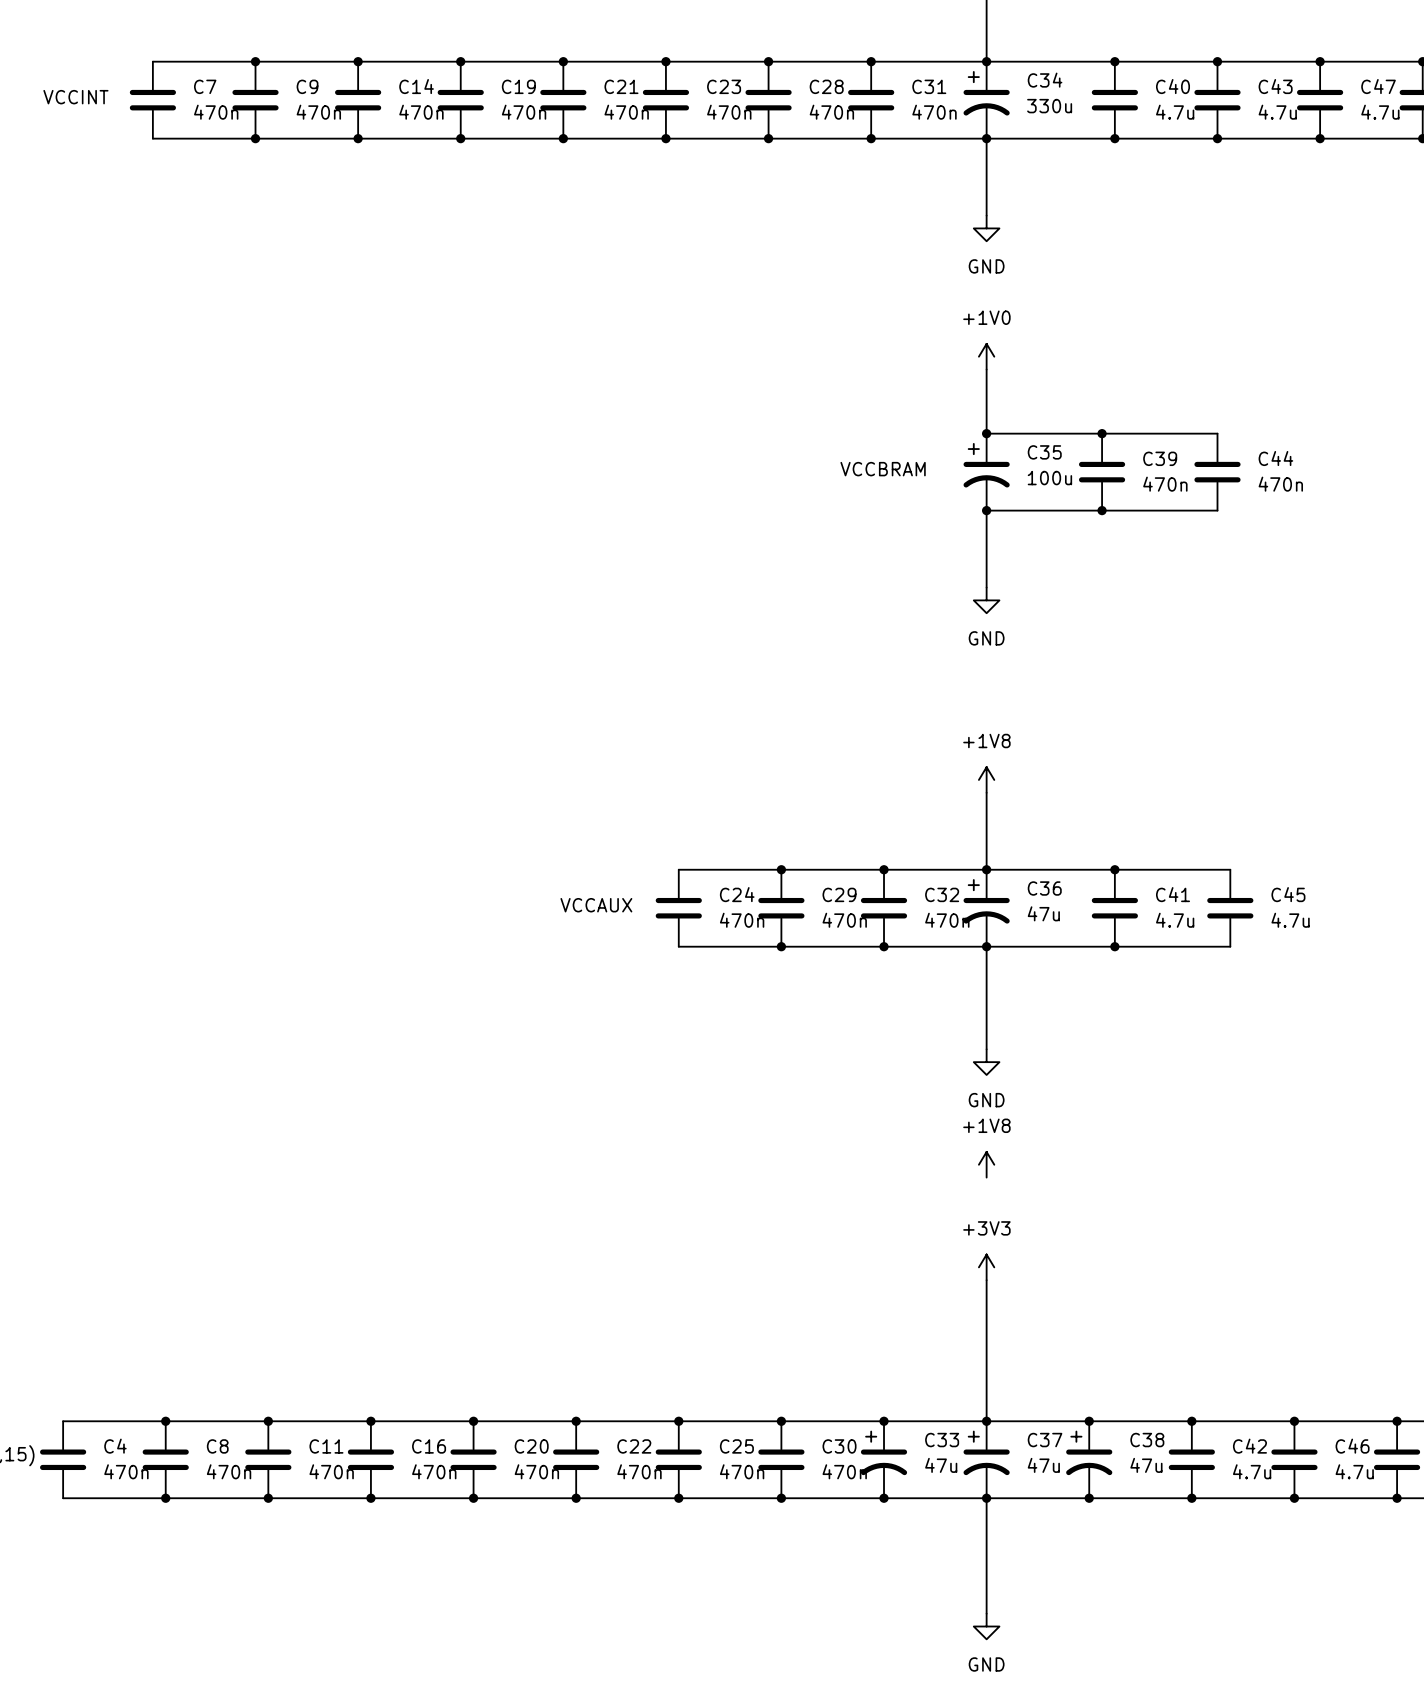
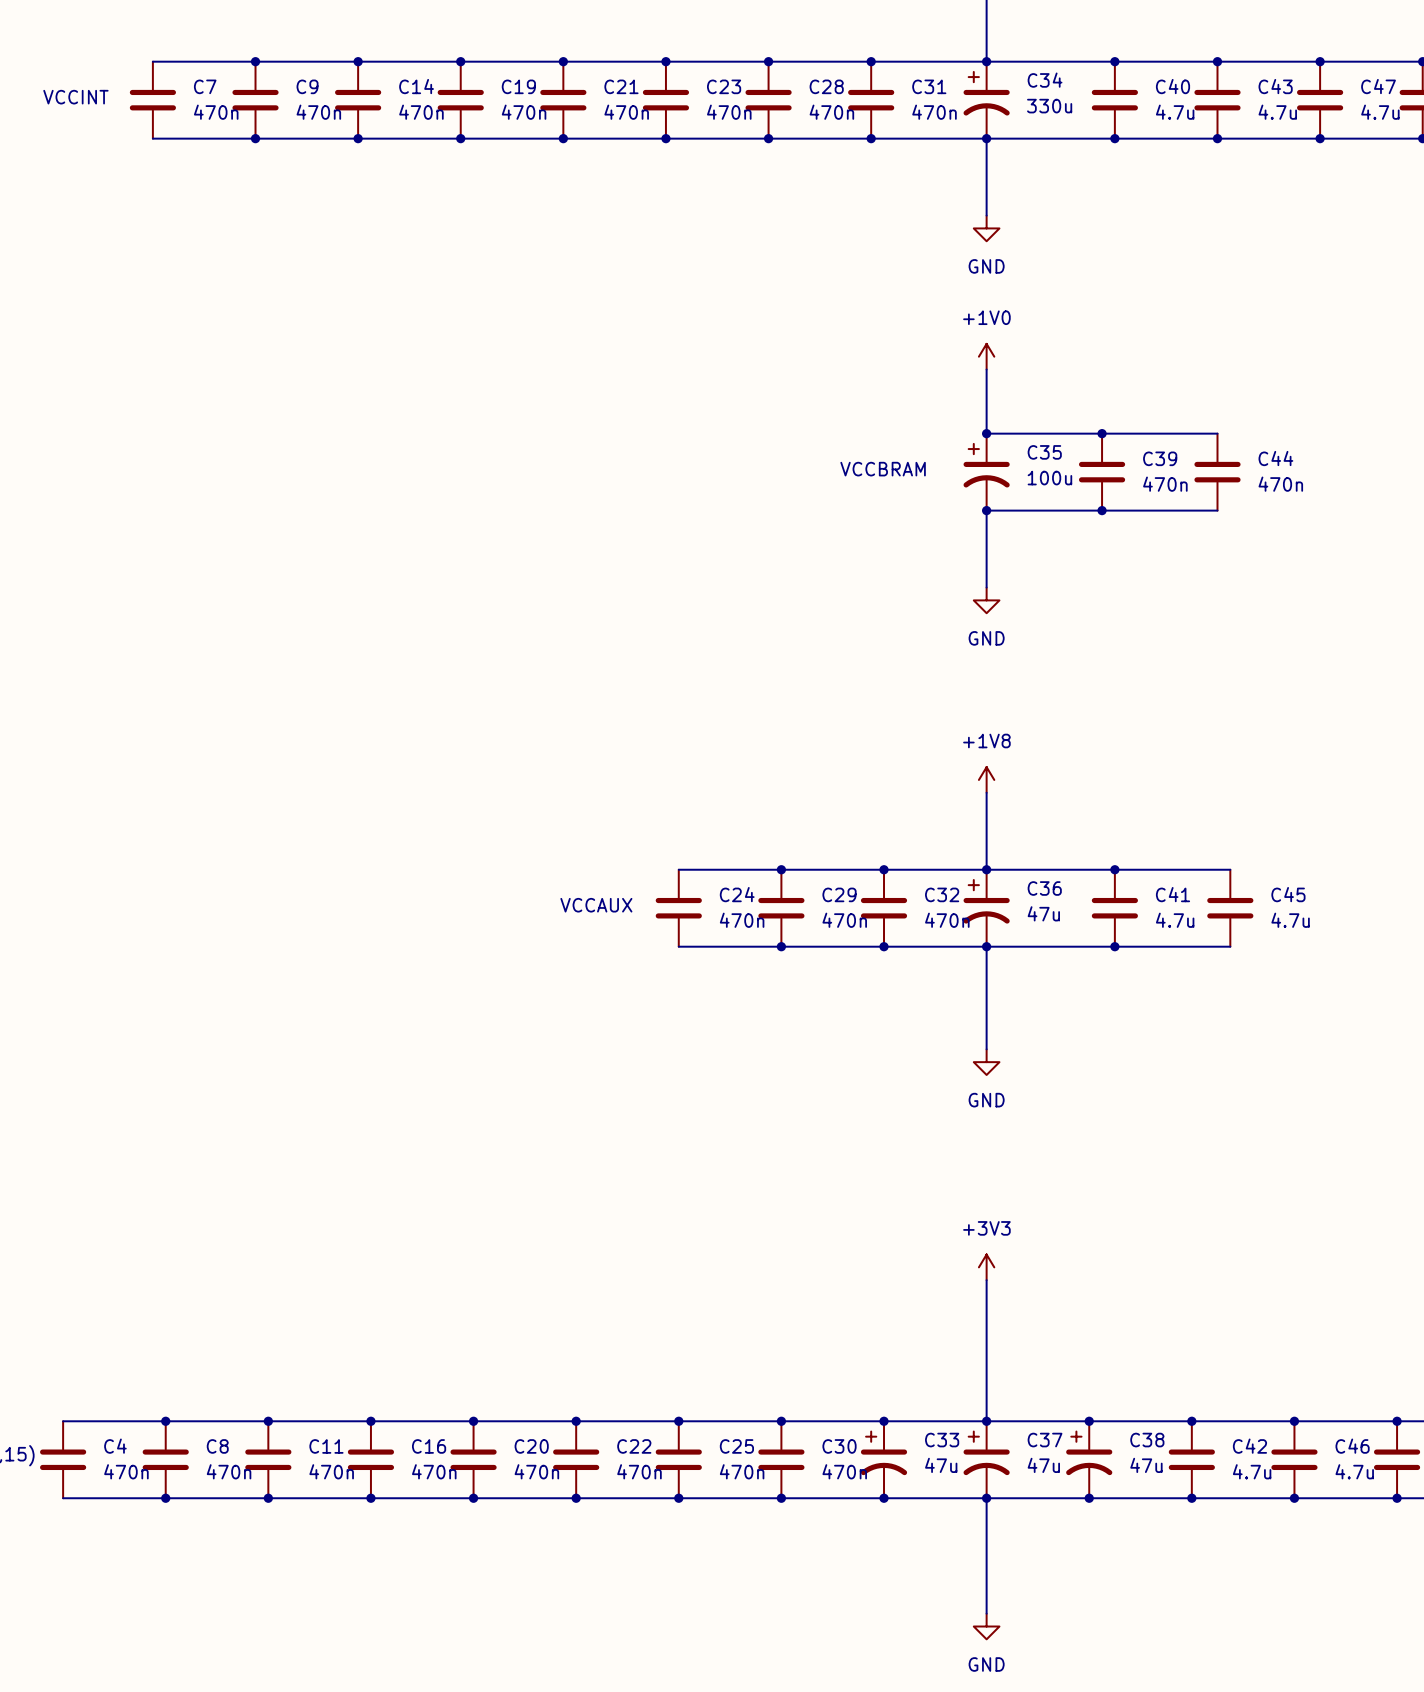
power symbol: +1V8 (986, 1164) -> none

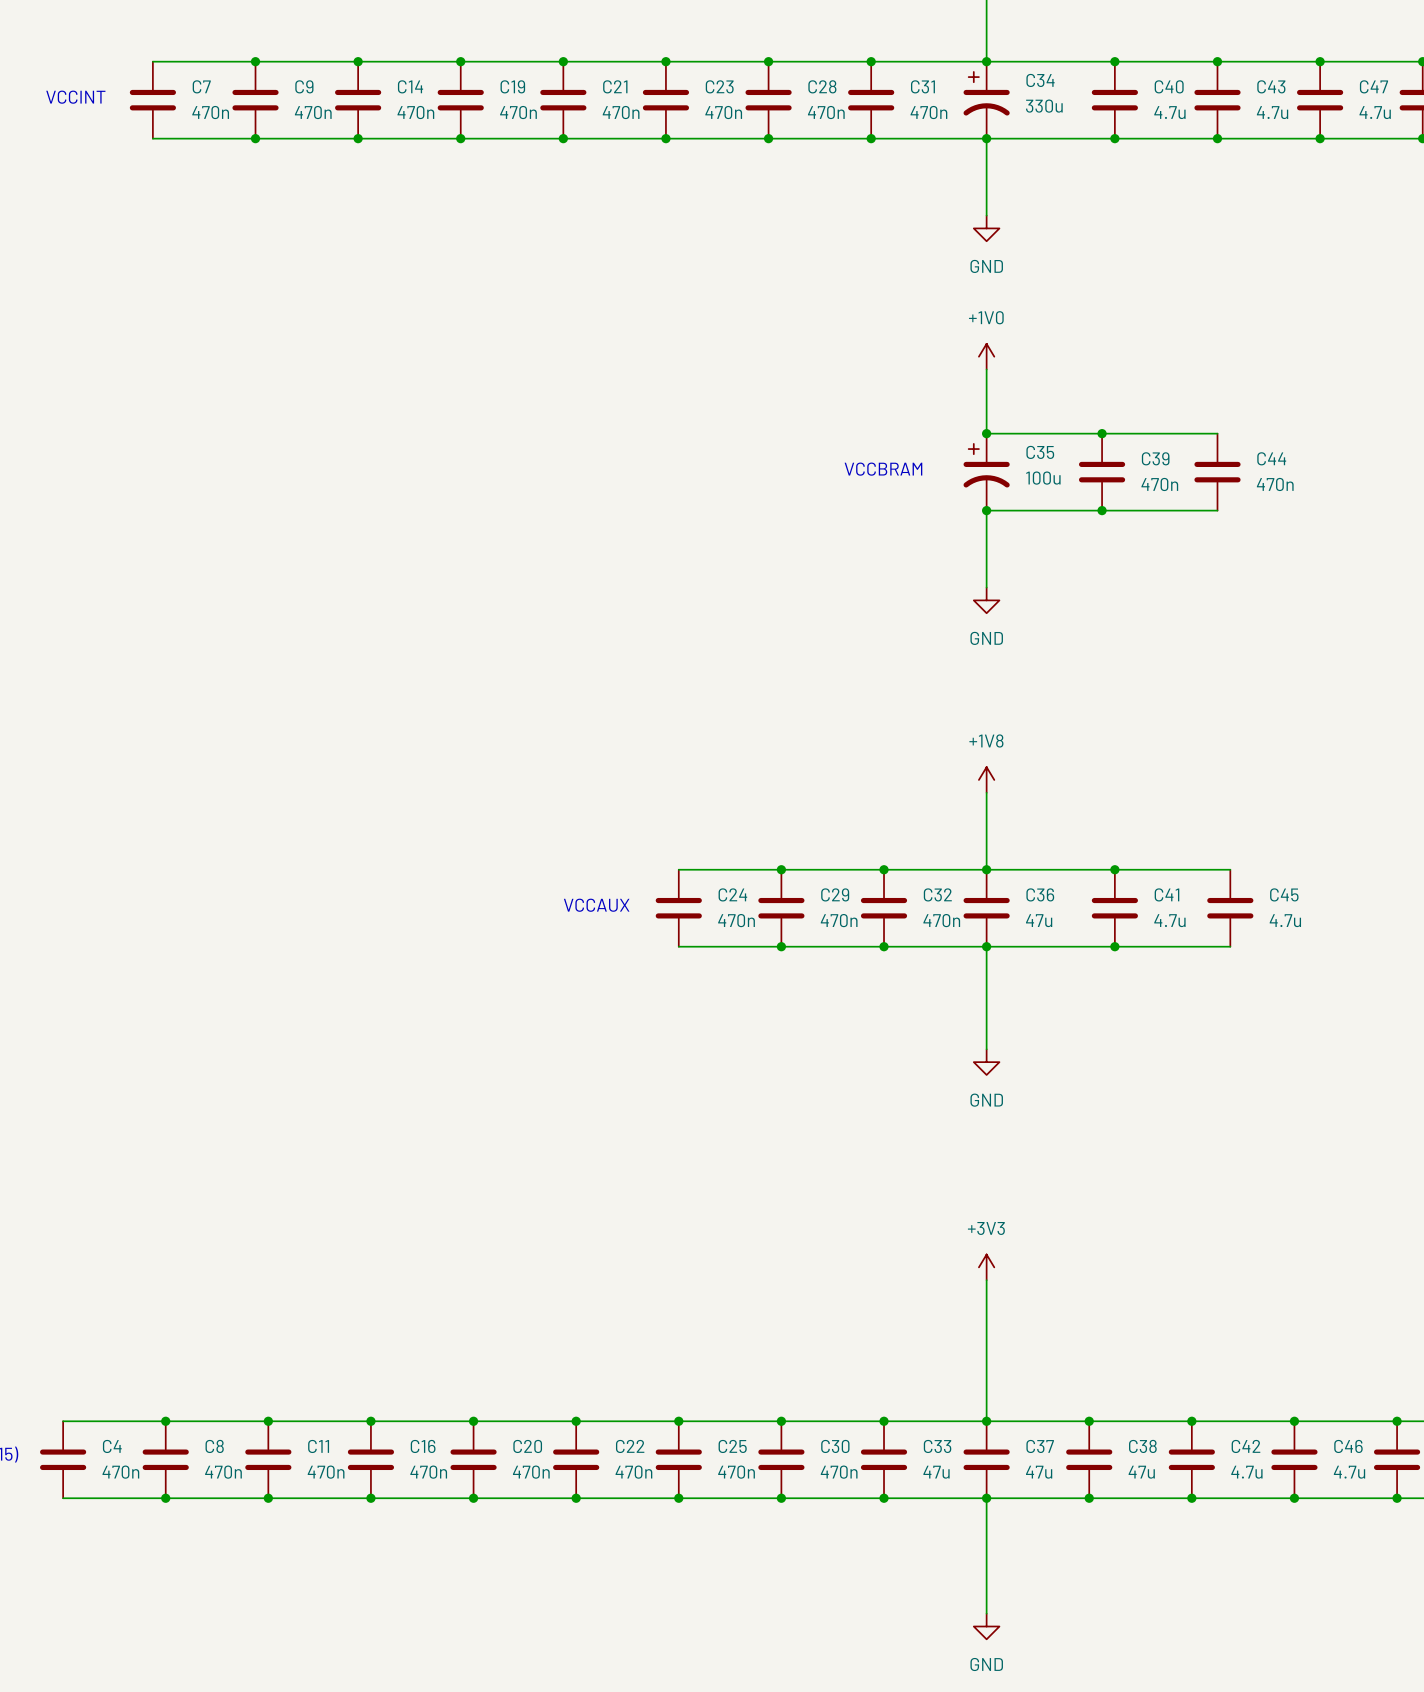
C36 symbol: [963, 869, 1010, 947] -> [963, 869, 1010, 947]
C33 symbol: [860, 1421, 908, 1499] -> [860, 1421, 908, 1499]
C37 symbol: [963, 1421, 1010, 1499] -> [963, 1421, 1010, 1499]
C38 symbol: [1066, 1421, 1113, 1499] -> [1066, 1421, 1113, 1499]

